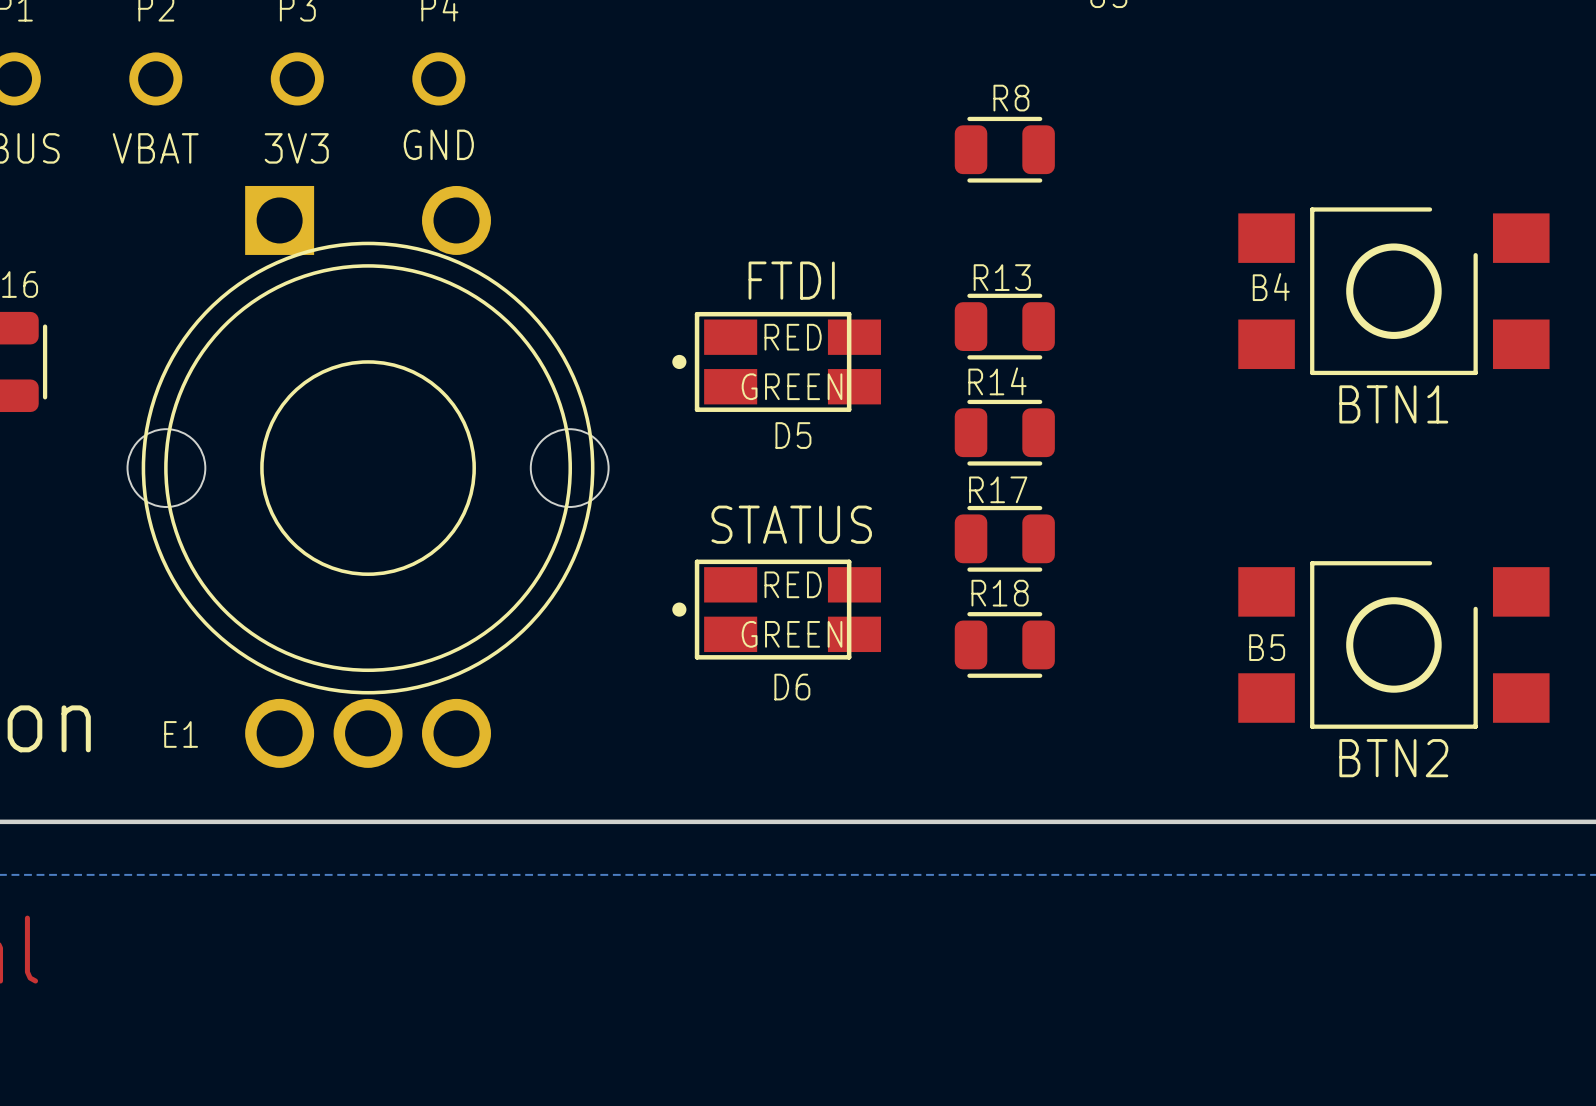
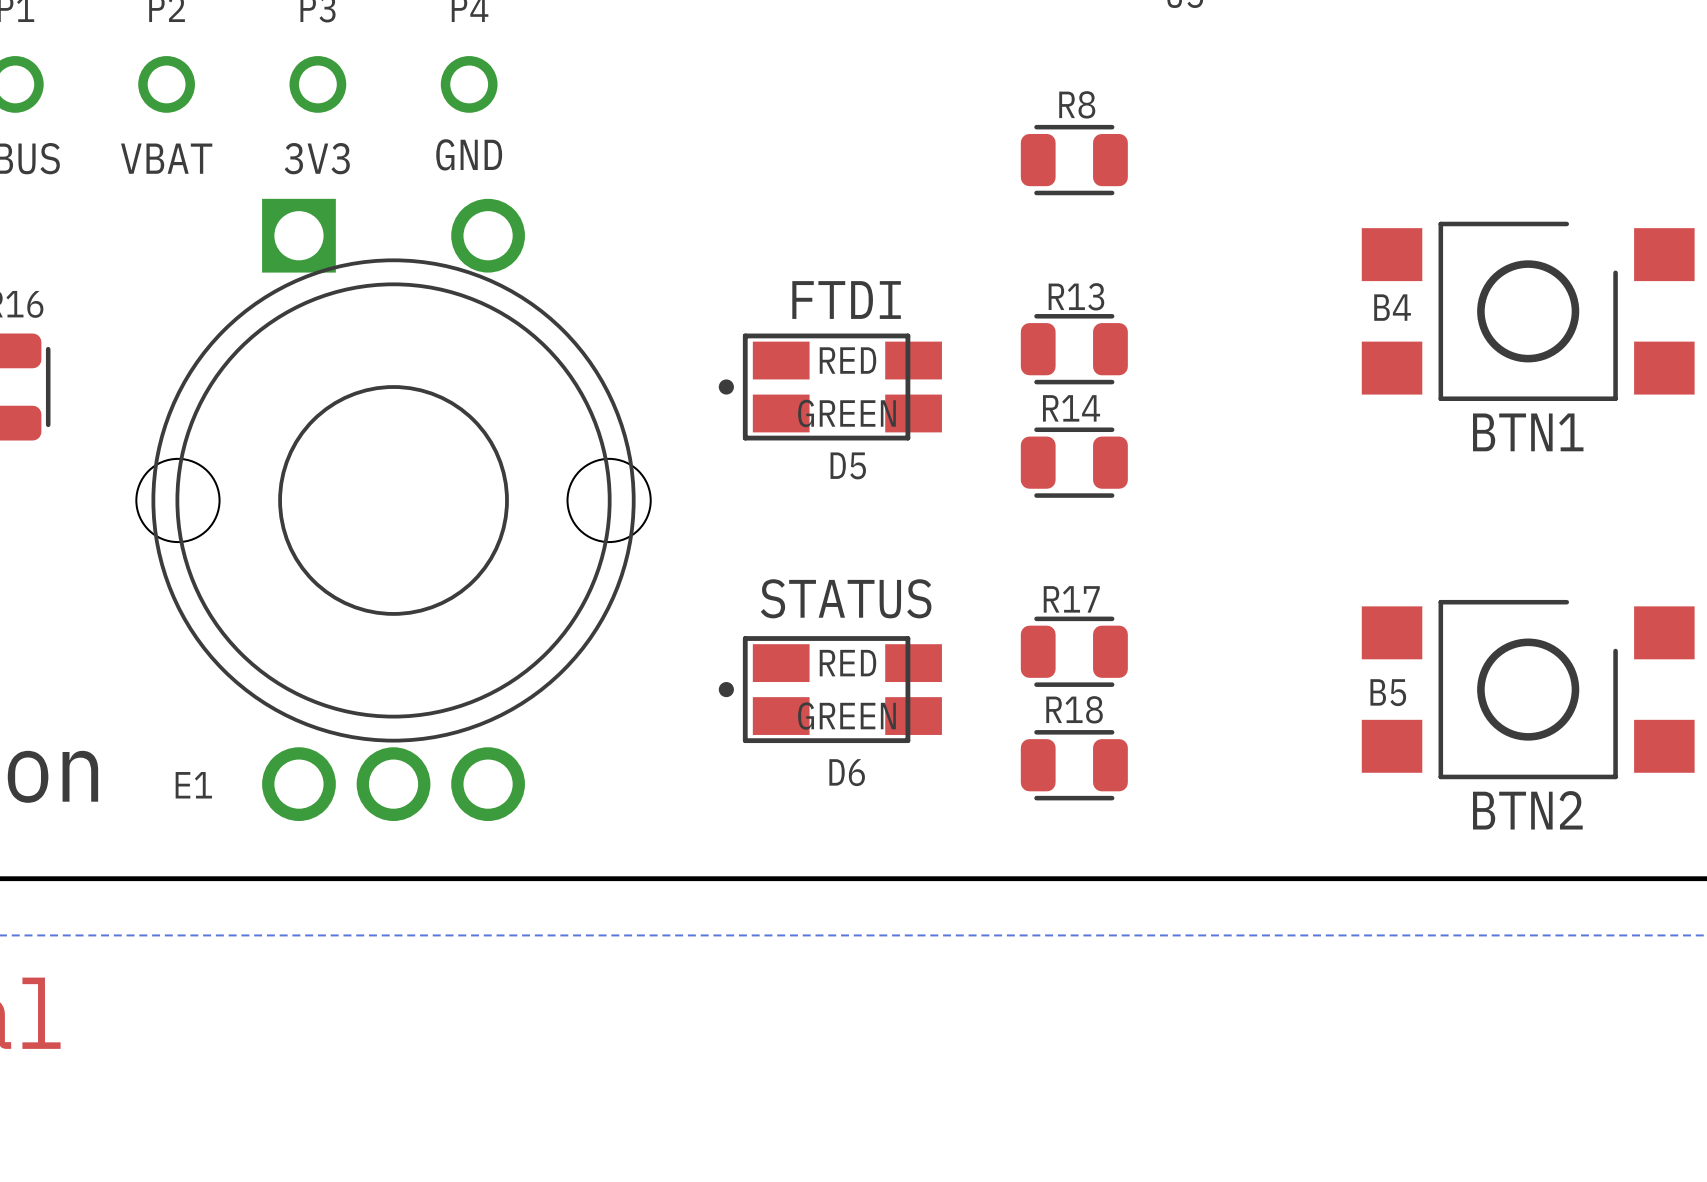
B4 position: (1393, 291) -> (1528, 311)
text position: BTN1 (1393, 404) -> BTN1 (1528, 432)
text position: STATUS (791, 524) -> STATUS (846, 598)
R17 position: (1004, 538) -> (1074, 651)
D6 position: (776, 609) -> (830, 689)
R18 position: (1004, 644) -> (1074, 765)
B5 position: (1393, 644) -> (1528, 689)
text position: BTN2 (1393, 758) -> BTN2 (1527, 810)

